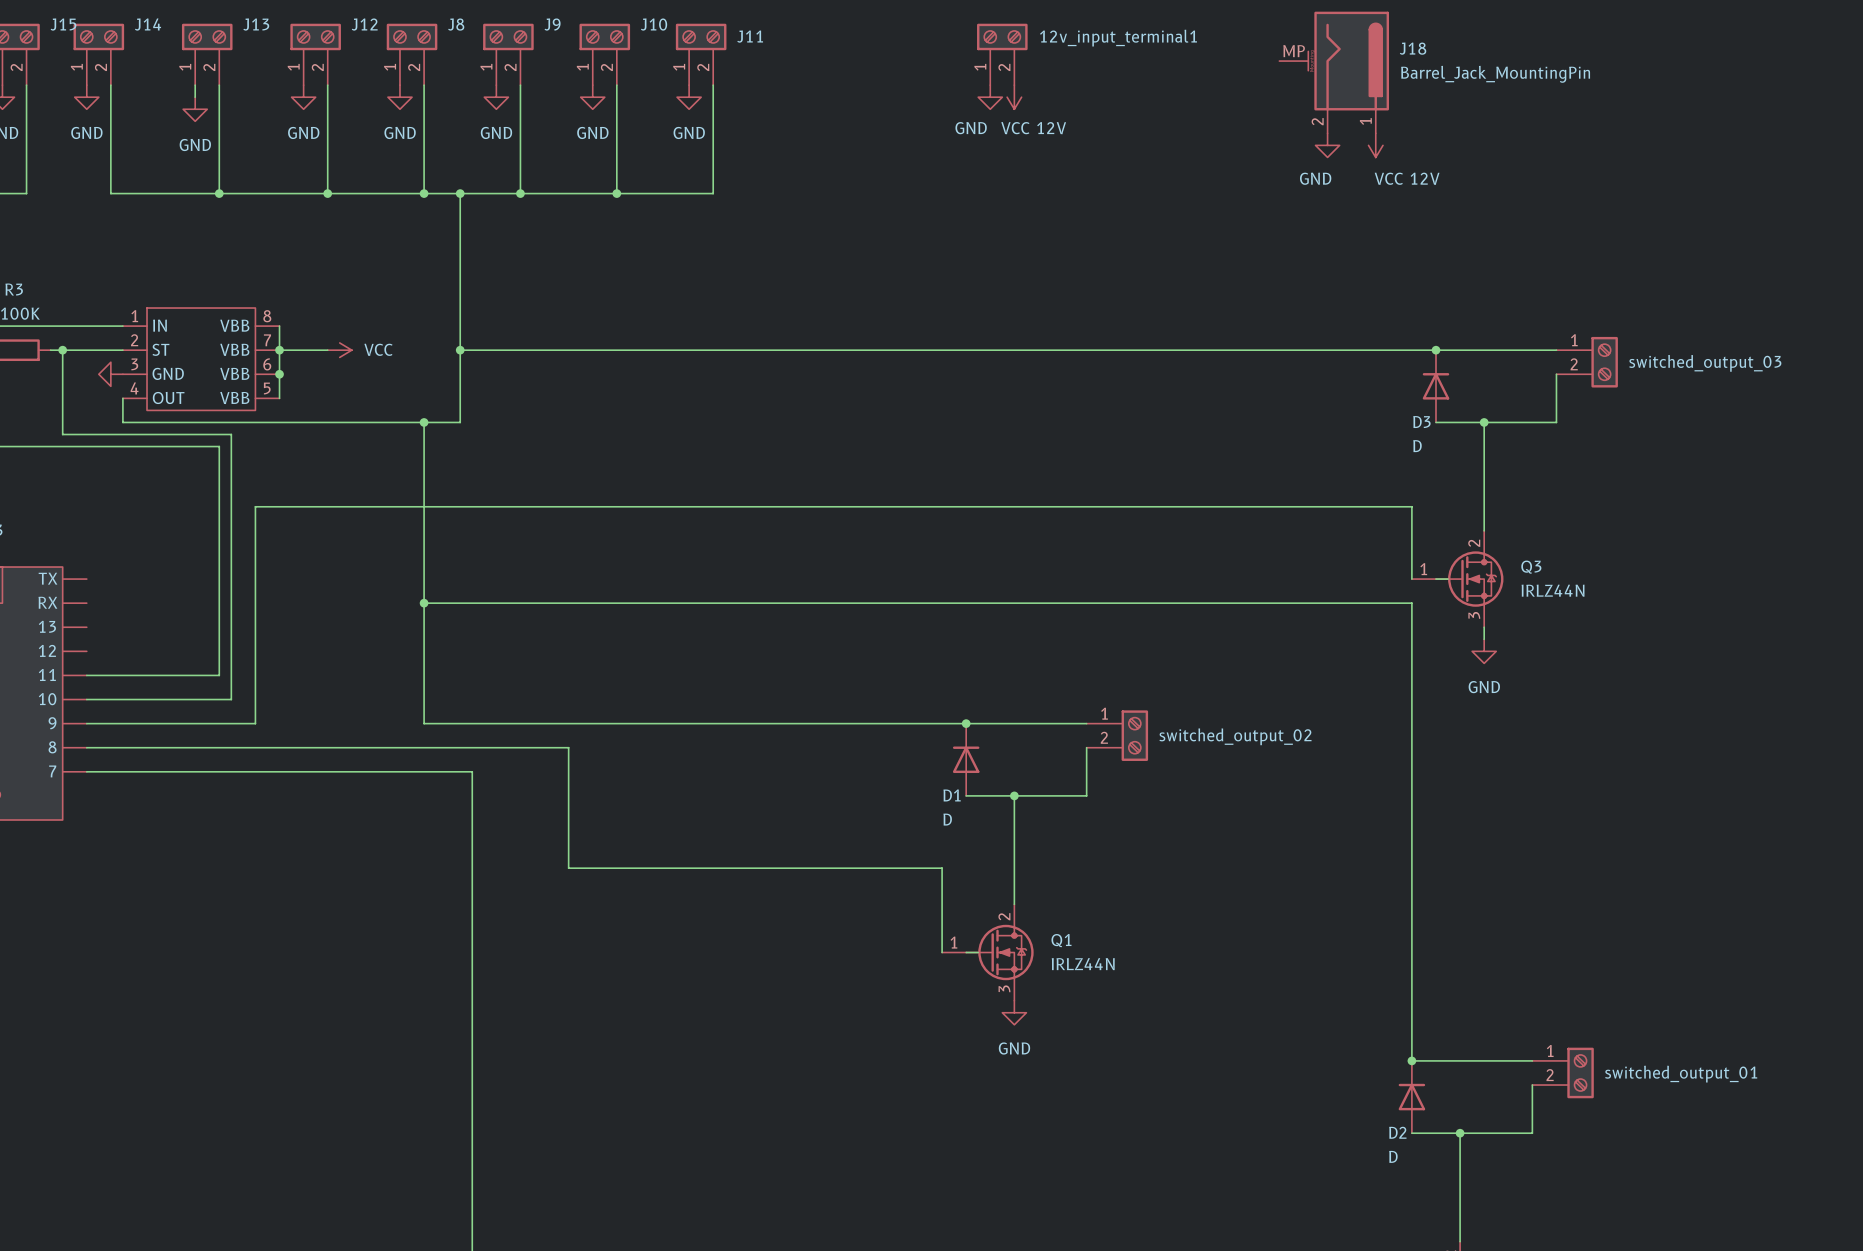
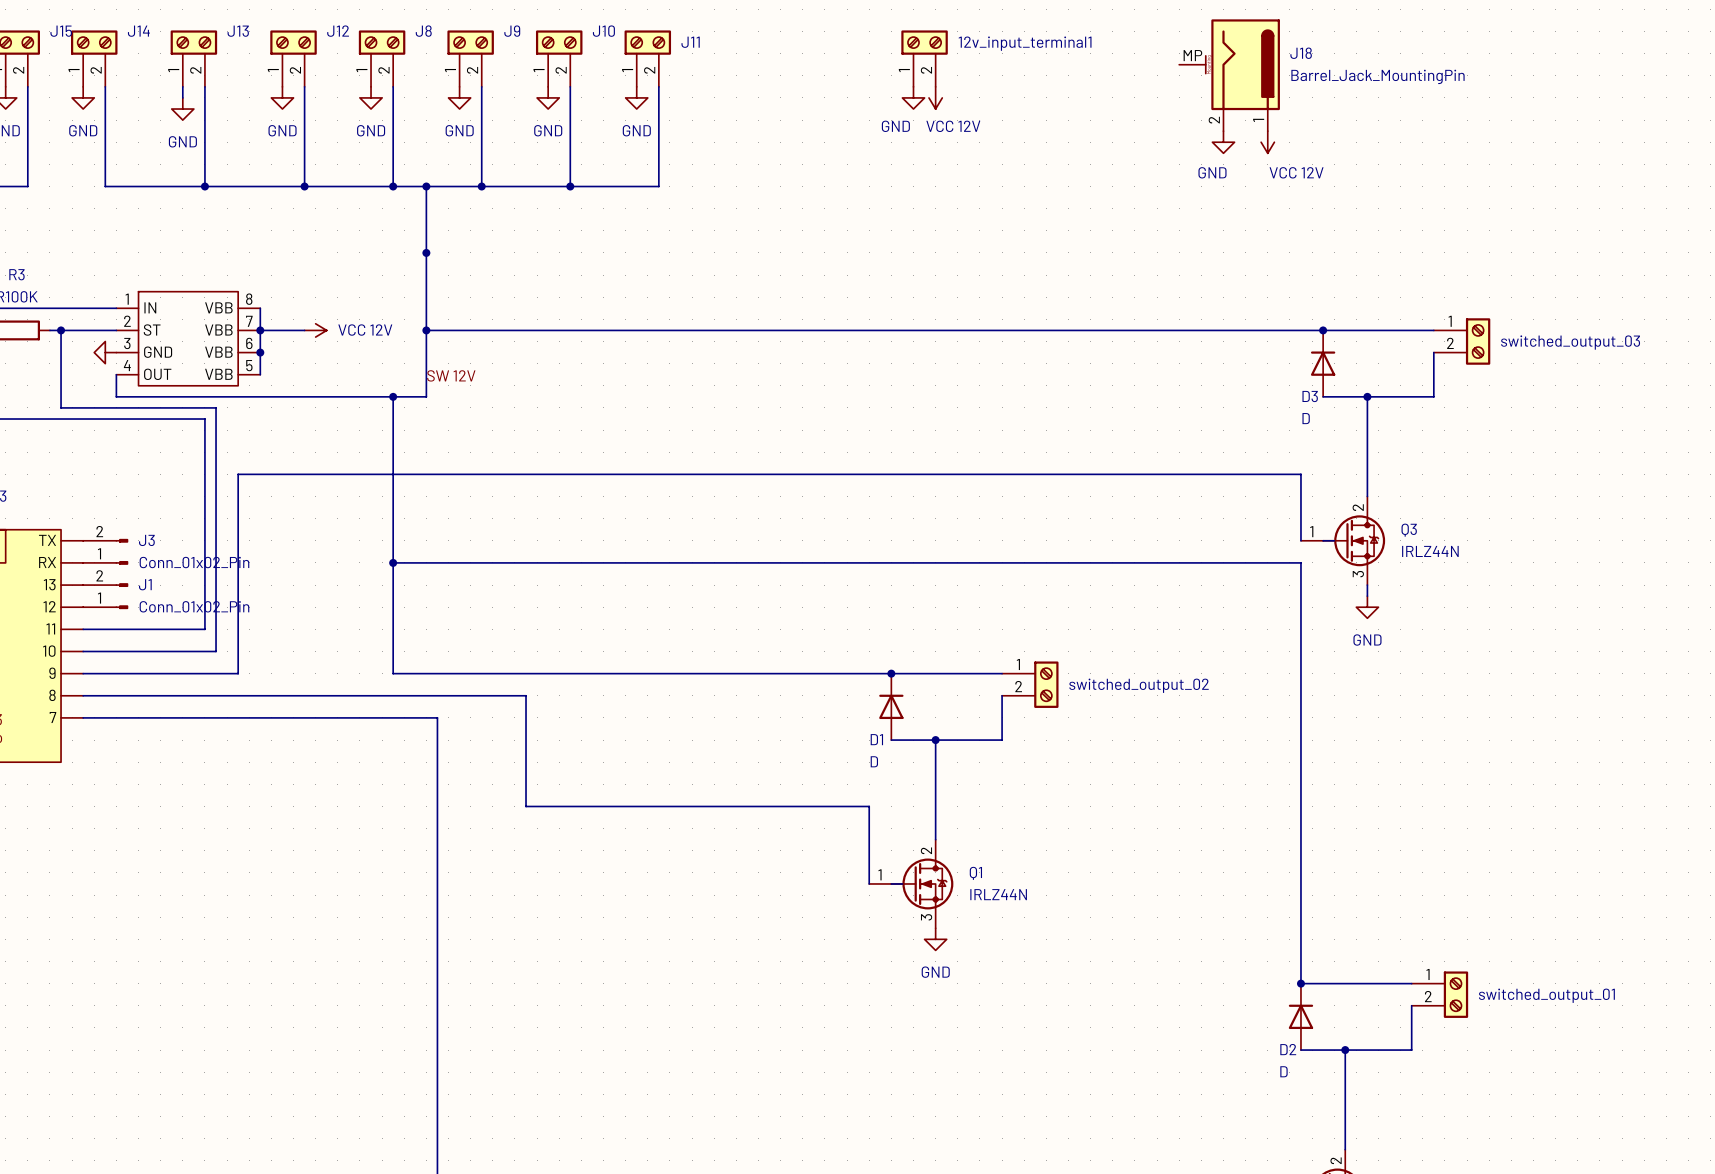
junction: none -> (426, 252)
power symbol: VCC (339, 350) -> VCC 12V (315, 330)
label: none -> SW 12V (451, 375)
J3: none -> Conn_01x02_Pin (105, 551)
J1: none -> Conn_01x02_Pin (105, 596)

